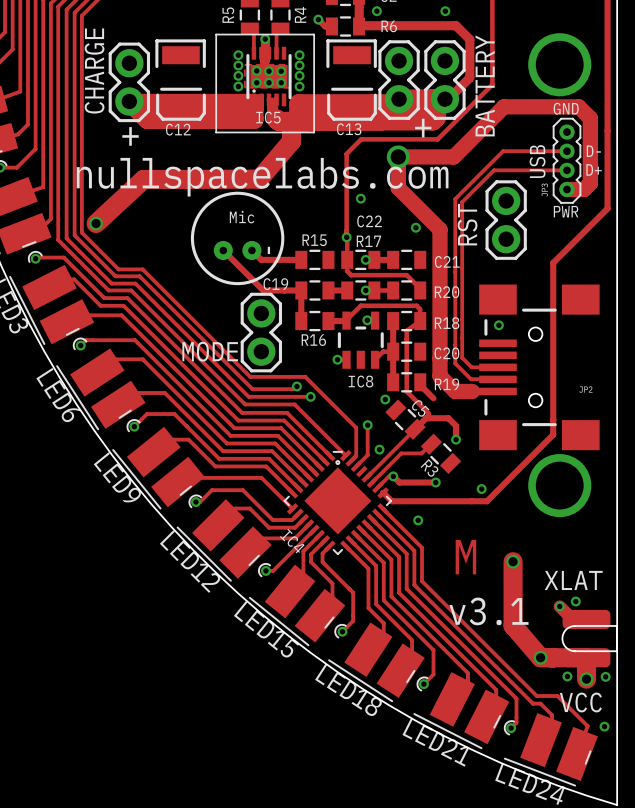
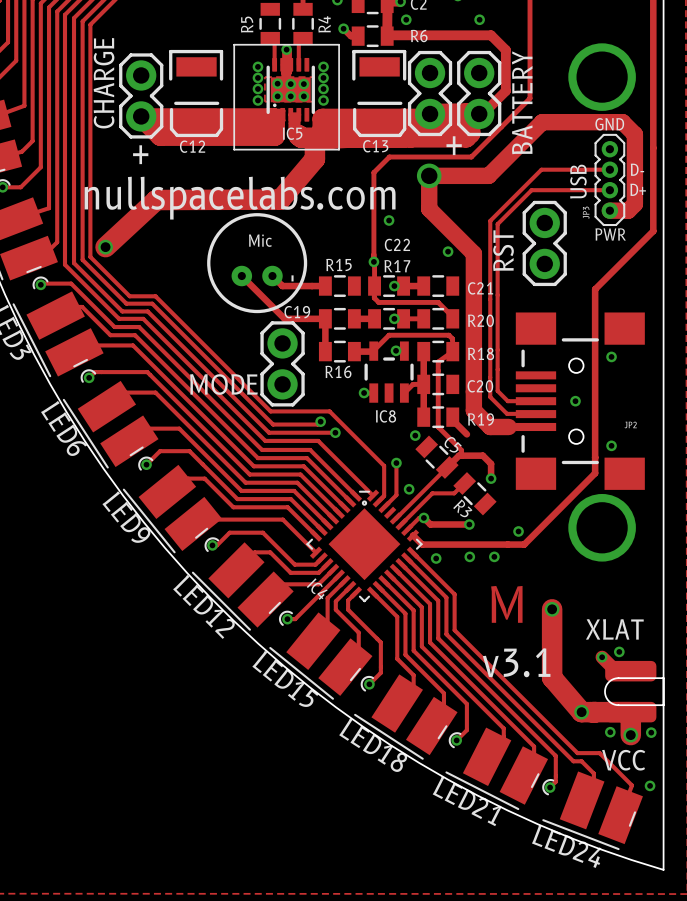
via: (498, 325) -> none
via: none -> (611, 356)
via: none -> (575, 401)
via: none -> (611, 445)
via: none -> (469, 556)
via: none -> (494, 556)
via: none -> (436, 558)
via: (418, 520) -> none

